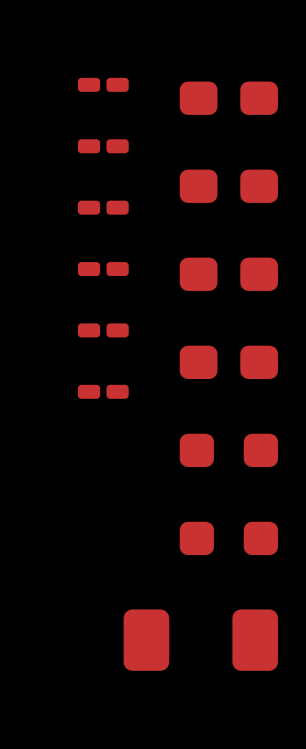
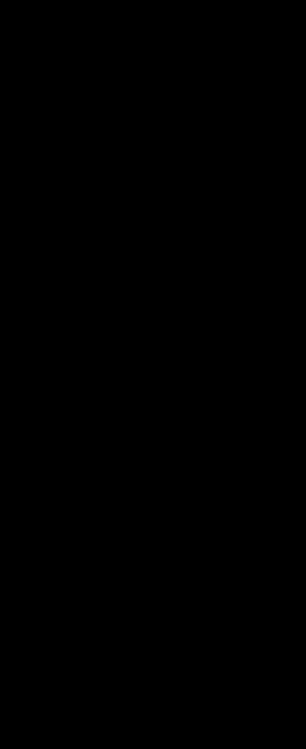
part: (103, 84) -> none
part: (228, 98) -> none
part: (103, 146) -> none
part: (228, 186) -> none
part: (103, 207) -> none
part: (103, 269) -> none
part: (228, 274) -> none
part: (103, 330) -> none
part: (228, 362) -> none
part: (103, 391) -> none
part: (228, 450) -> none
part: (228, 538) -> none
part: (200, 640) -> none

